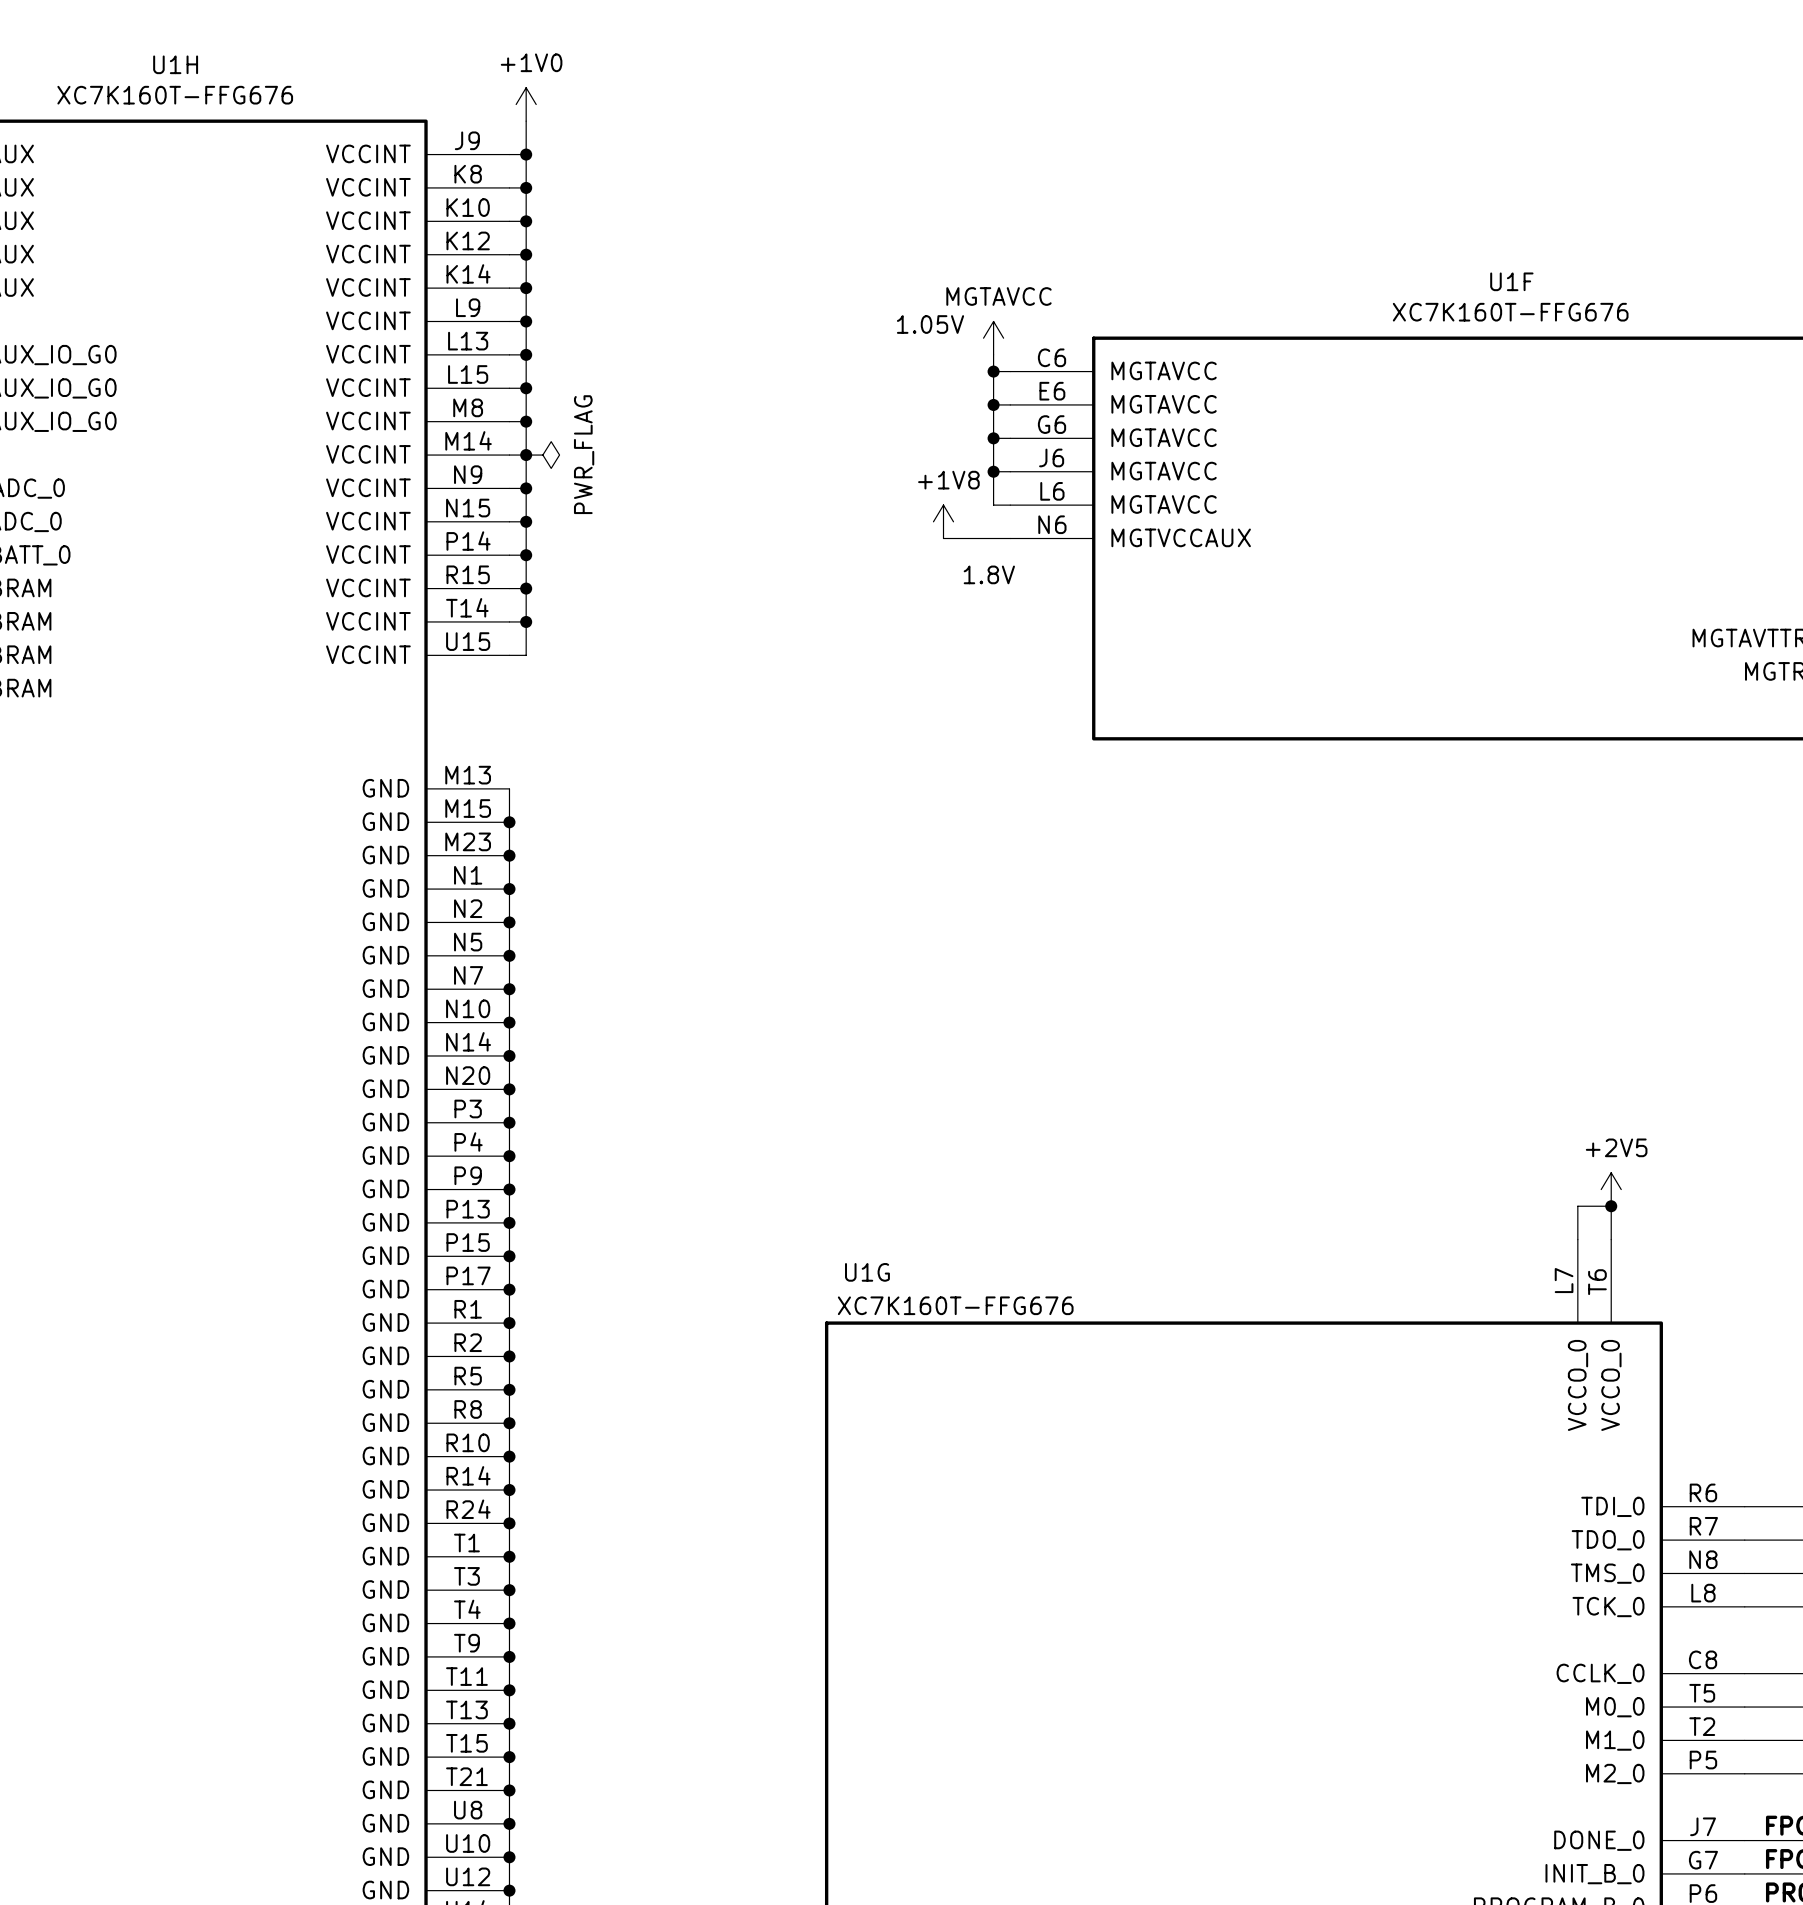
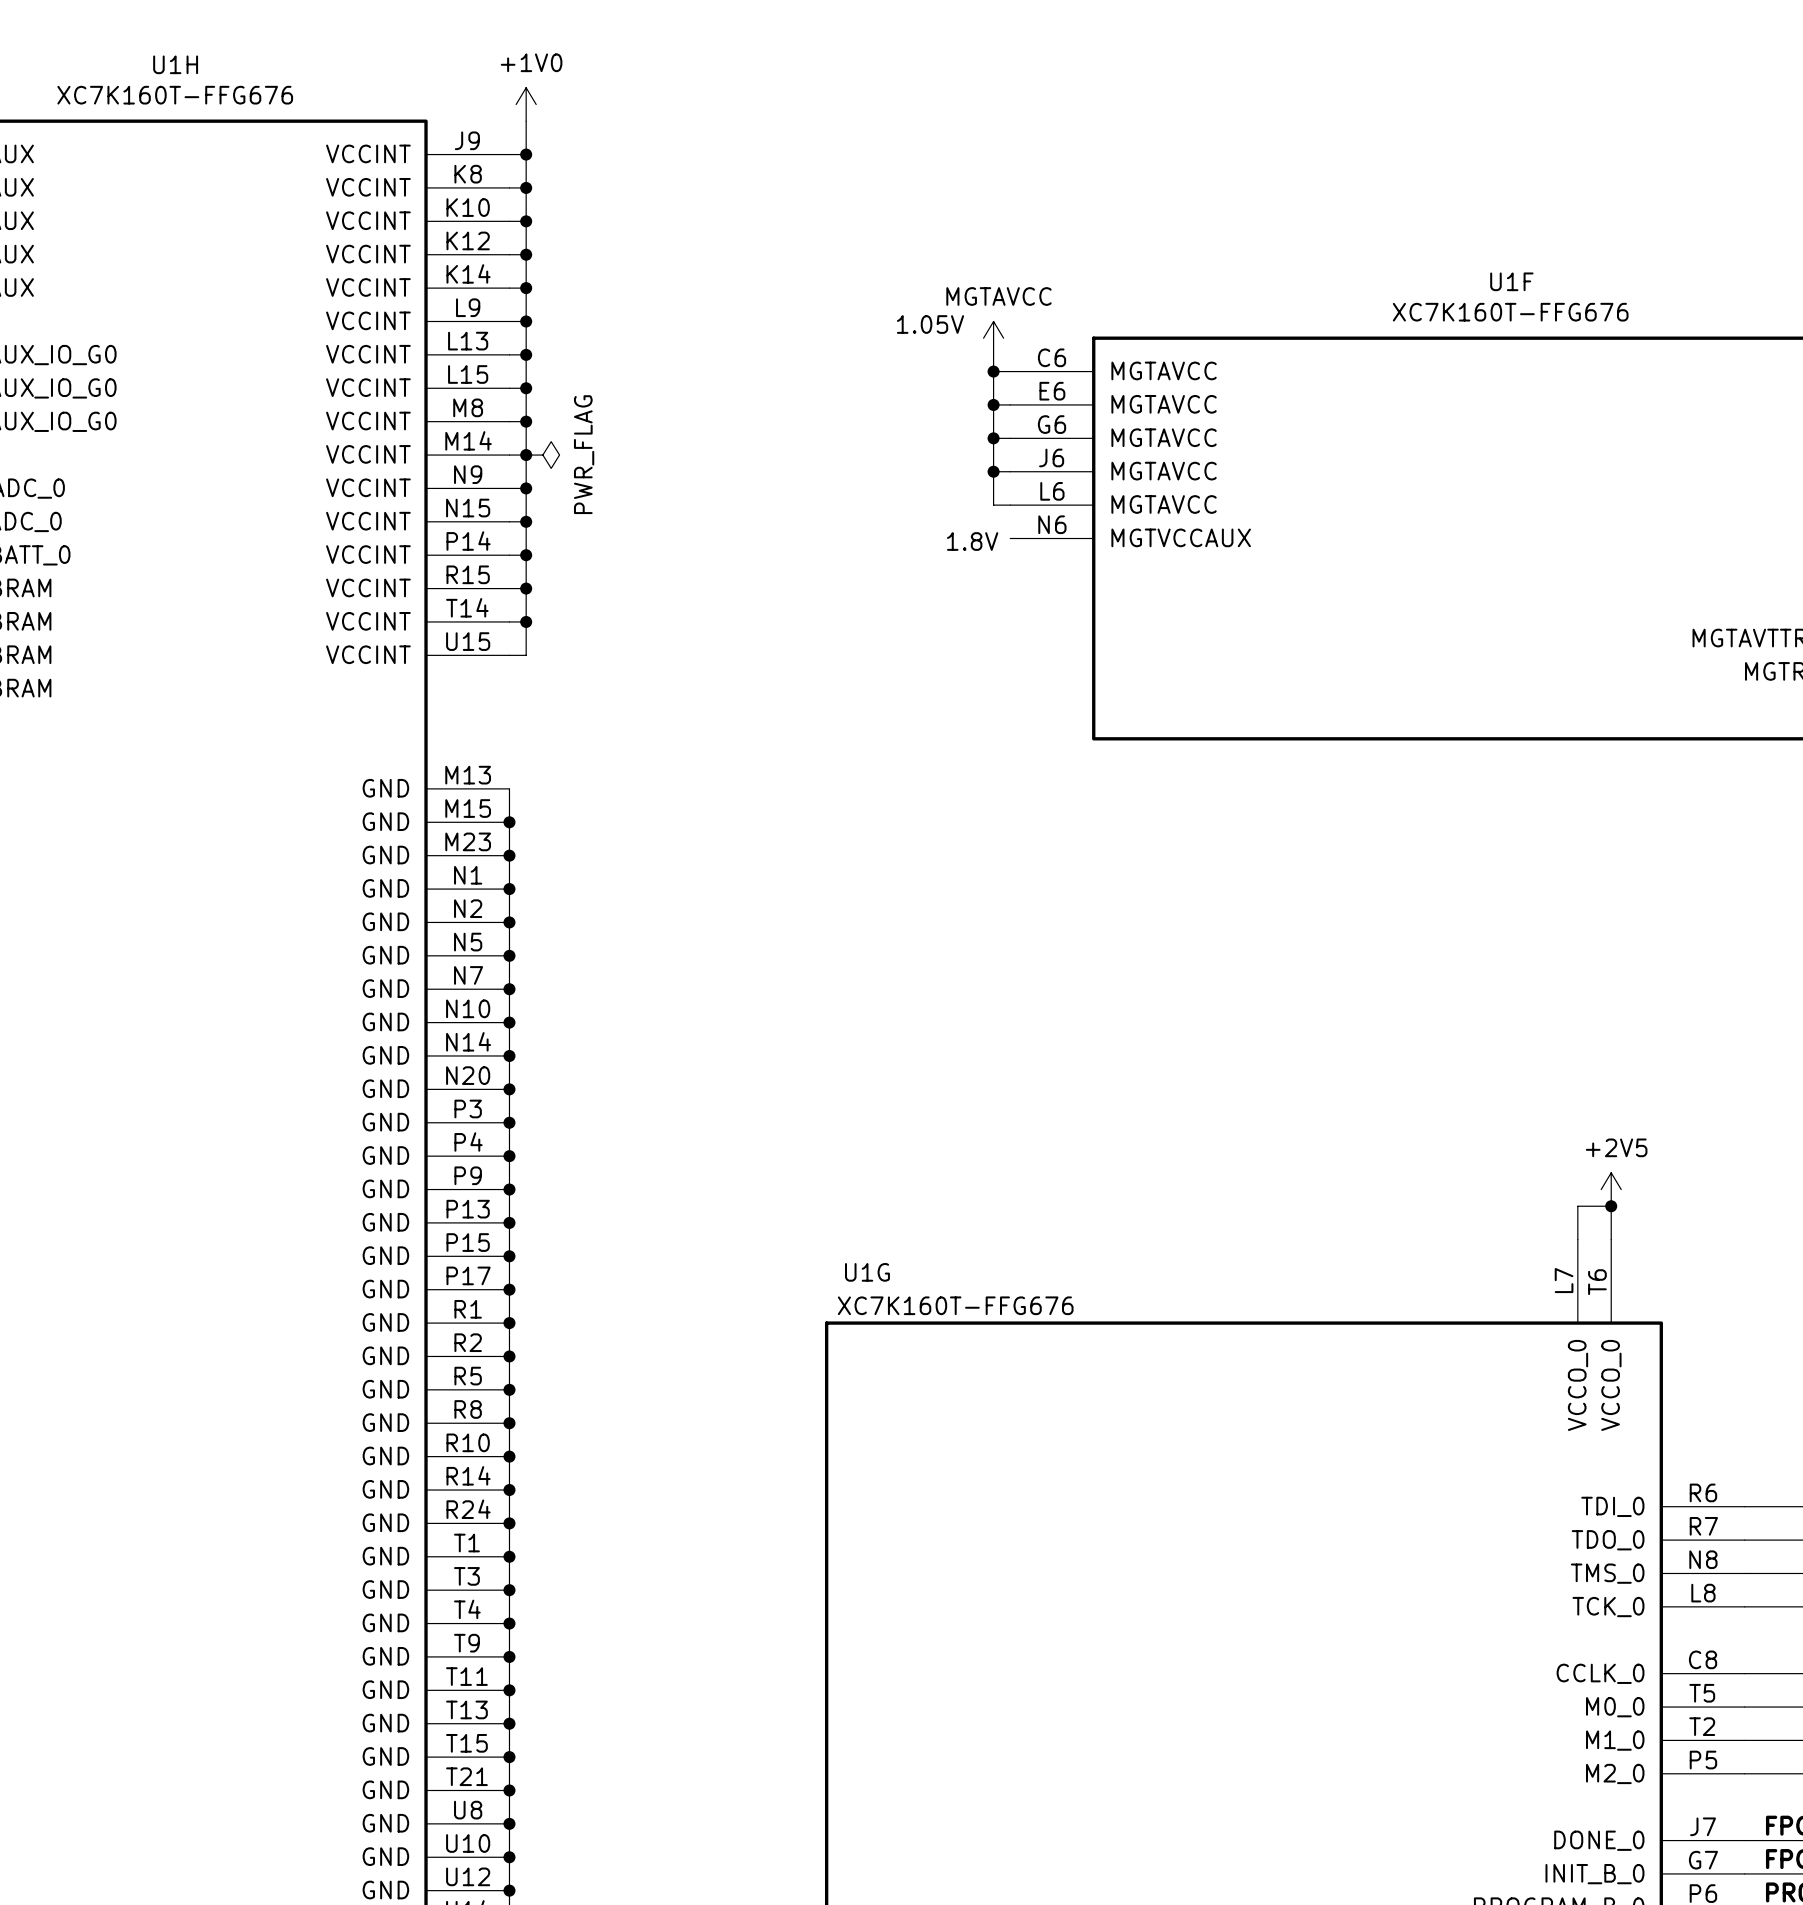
power symbol: +1V8 (943, 521) -> none
wire: (943, 538) (1010, 538) -> none
text position: 1.8V (989, 574) -> 1.8V (972, 541)

